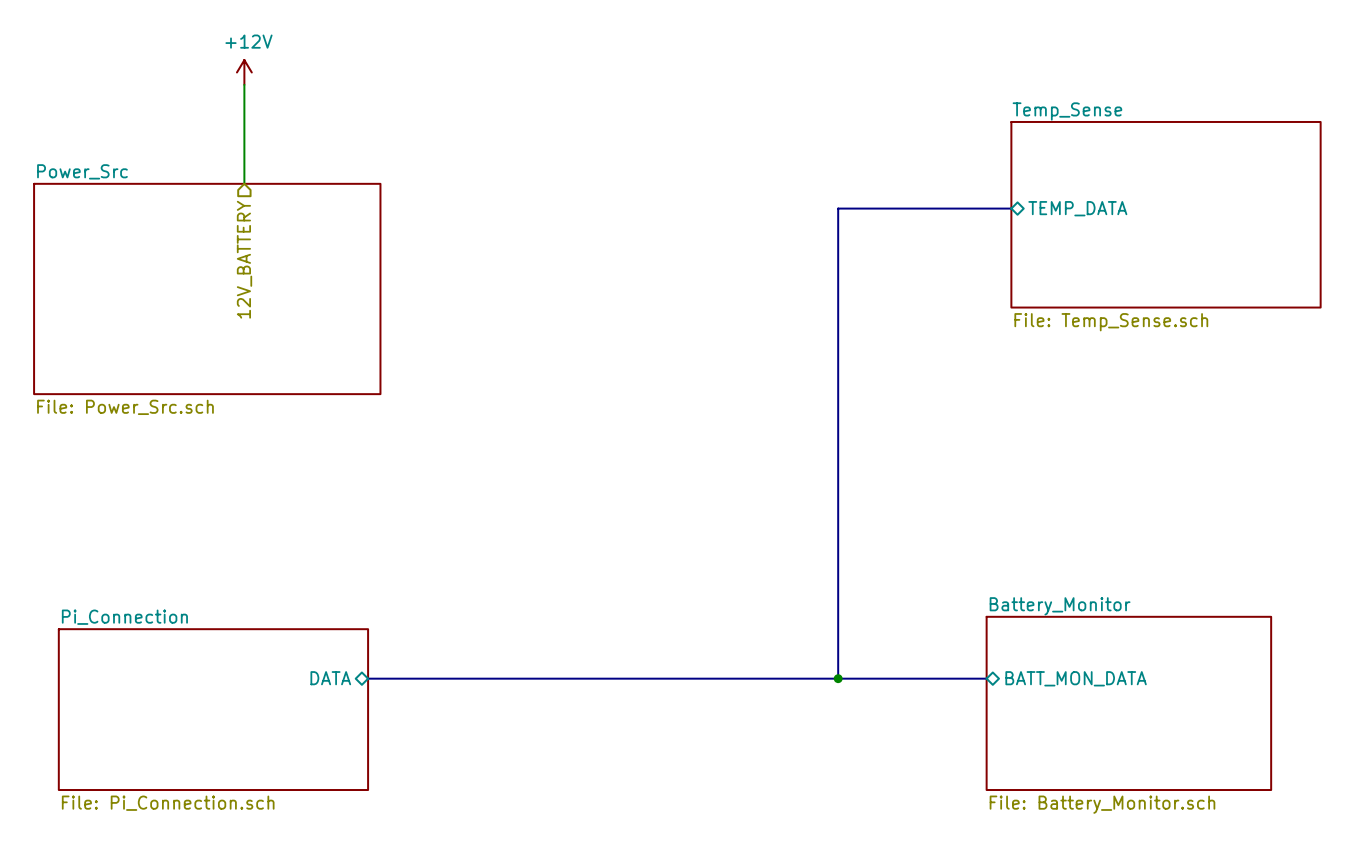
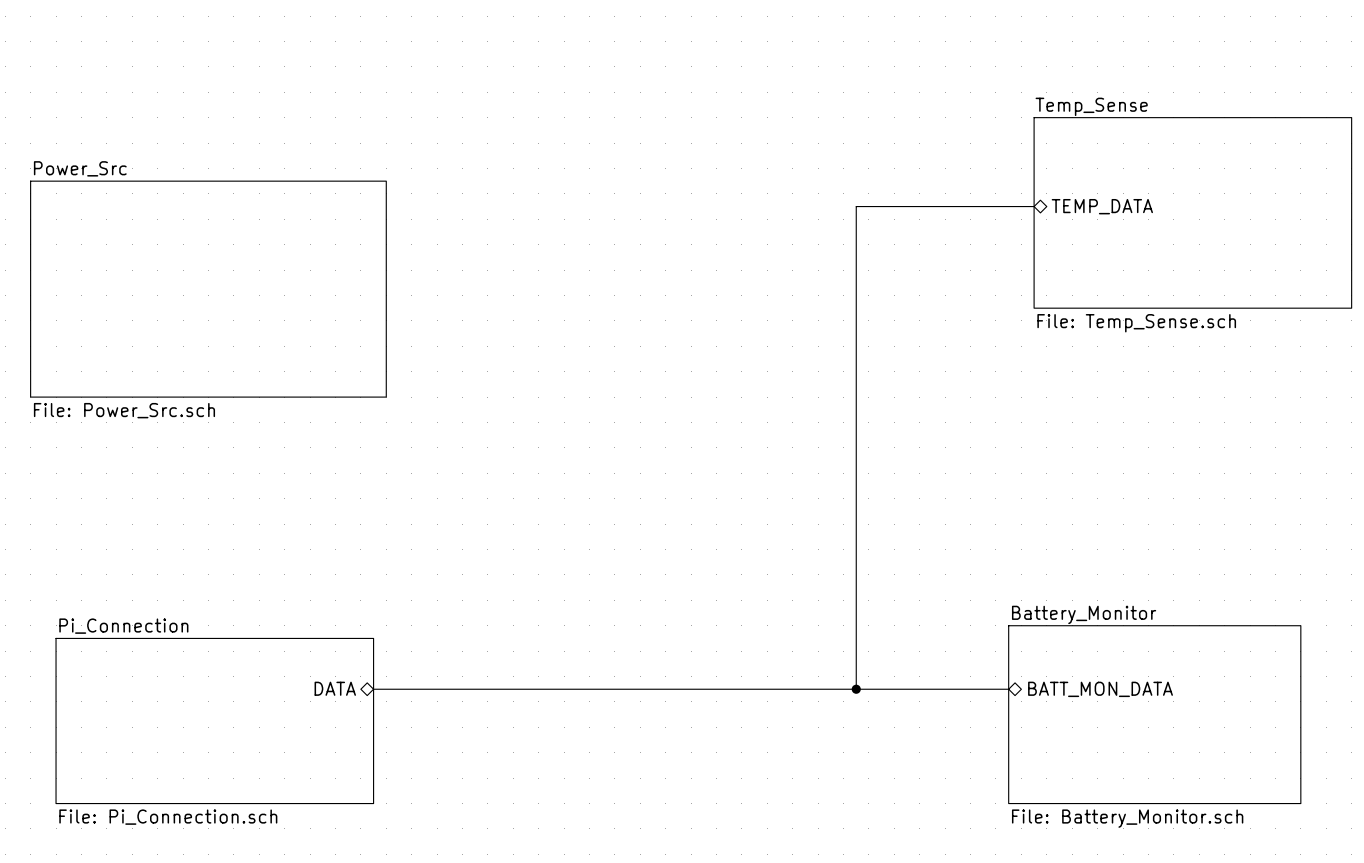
power symbol: +12V (244, 72) -> none
wire: (244, 84) (244, 183) -> none
hierarchical label: 12V_BATTERY (244, 259) -> none

